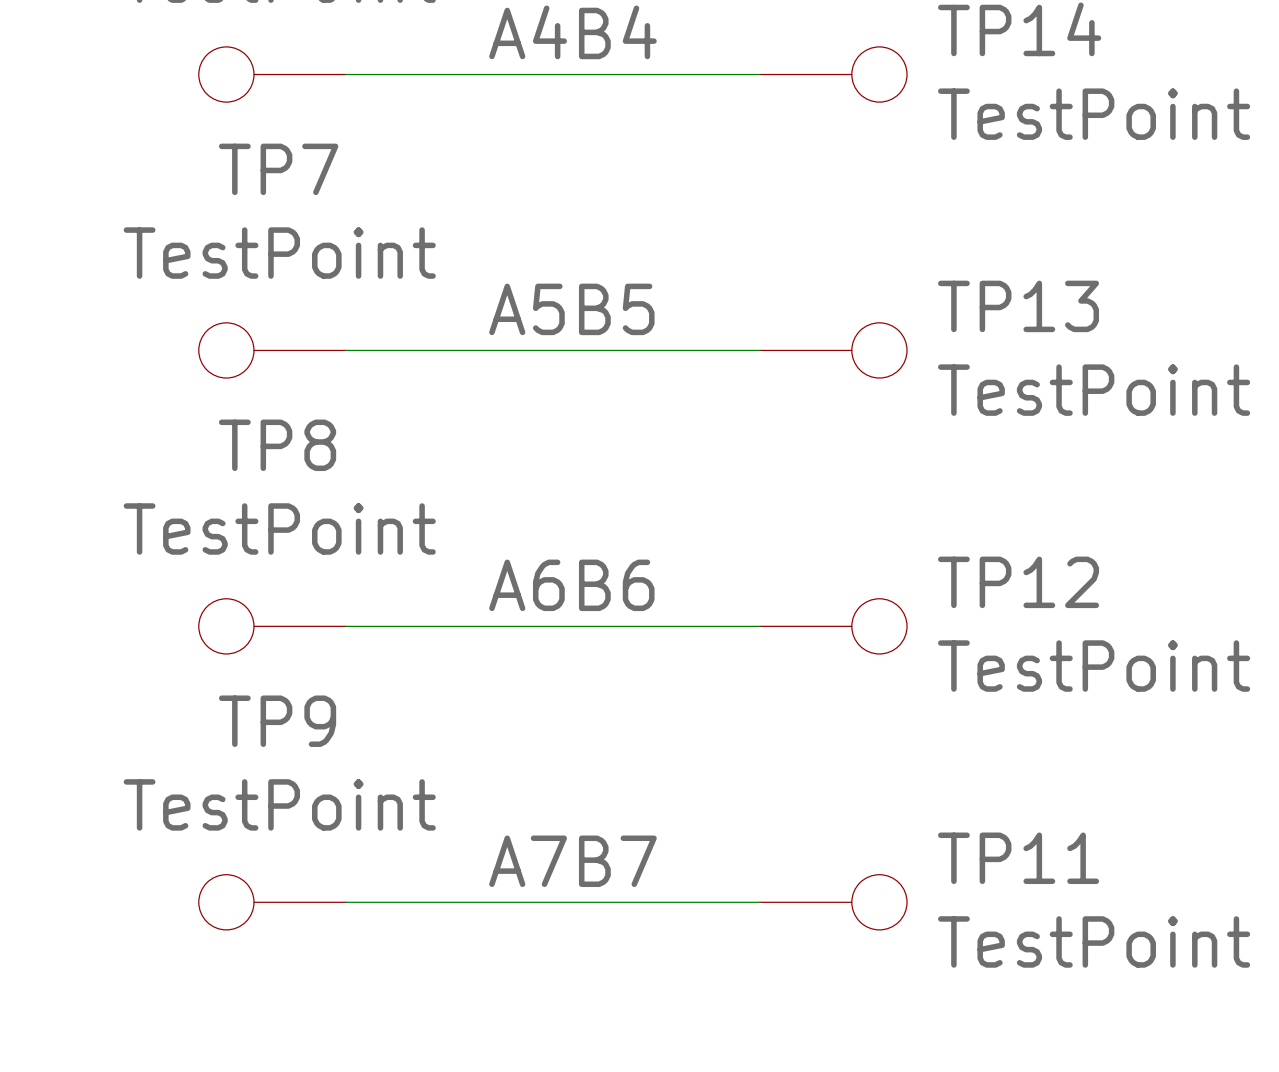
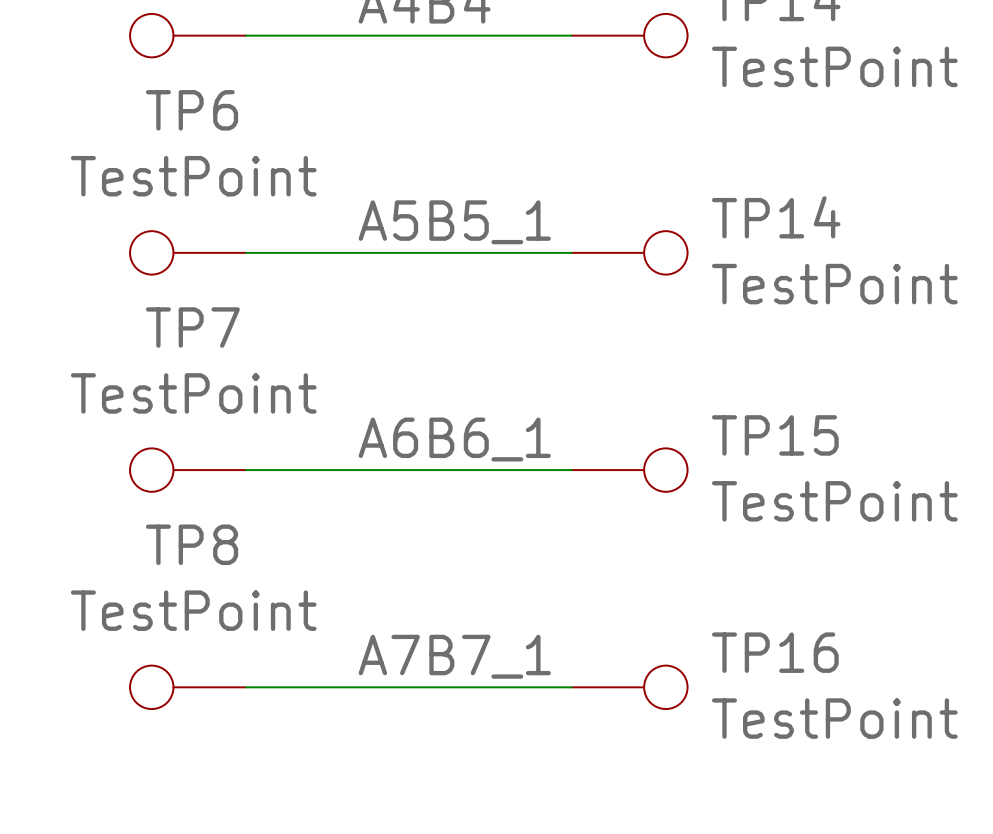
TP7 name: TP7 (278, 169) -> TP6 (192, 110)
TP13 name: TP13 (1018, 306) -> TP14 (776, 217)
label: A5B5 (571, 309) -> A5B5_1 (454, 222)
TP8 name: TP8 (277, 445) -> TP7 (192, 327)
TP12 name: TP12 (1018, 582) -> TP15 (775, 435)
label: A6B6 (571, 585) -> A6B6_1 (454, 439)
TP9 name: TP9 (277, 721) -> TP8 (192, 544)
TP11 name: TP11 (1018, 858) -> TP16 (775, 652)
label: A7B7 (572, 861) -> A7B7_1 (454, 656)

